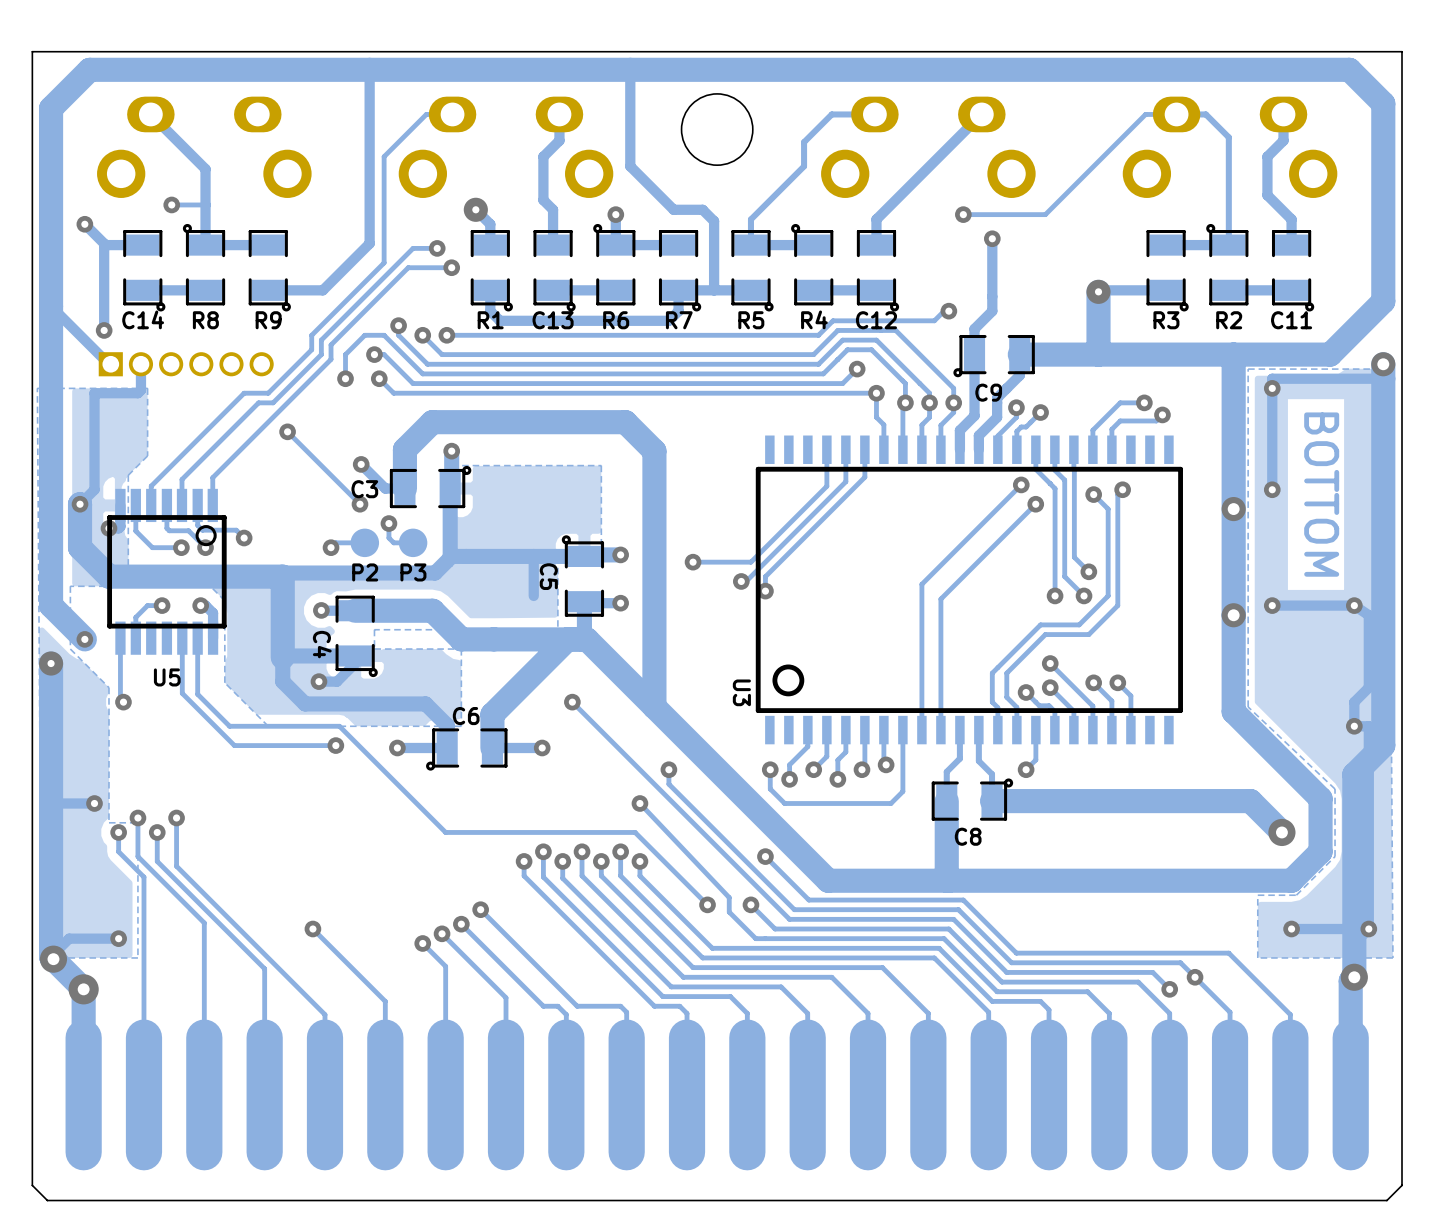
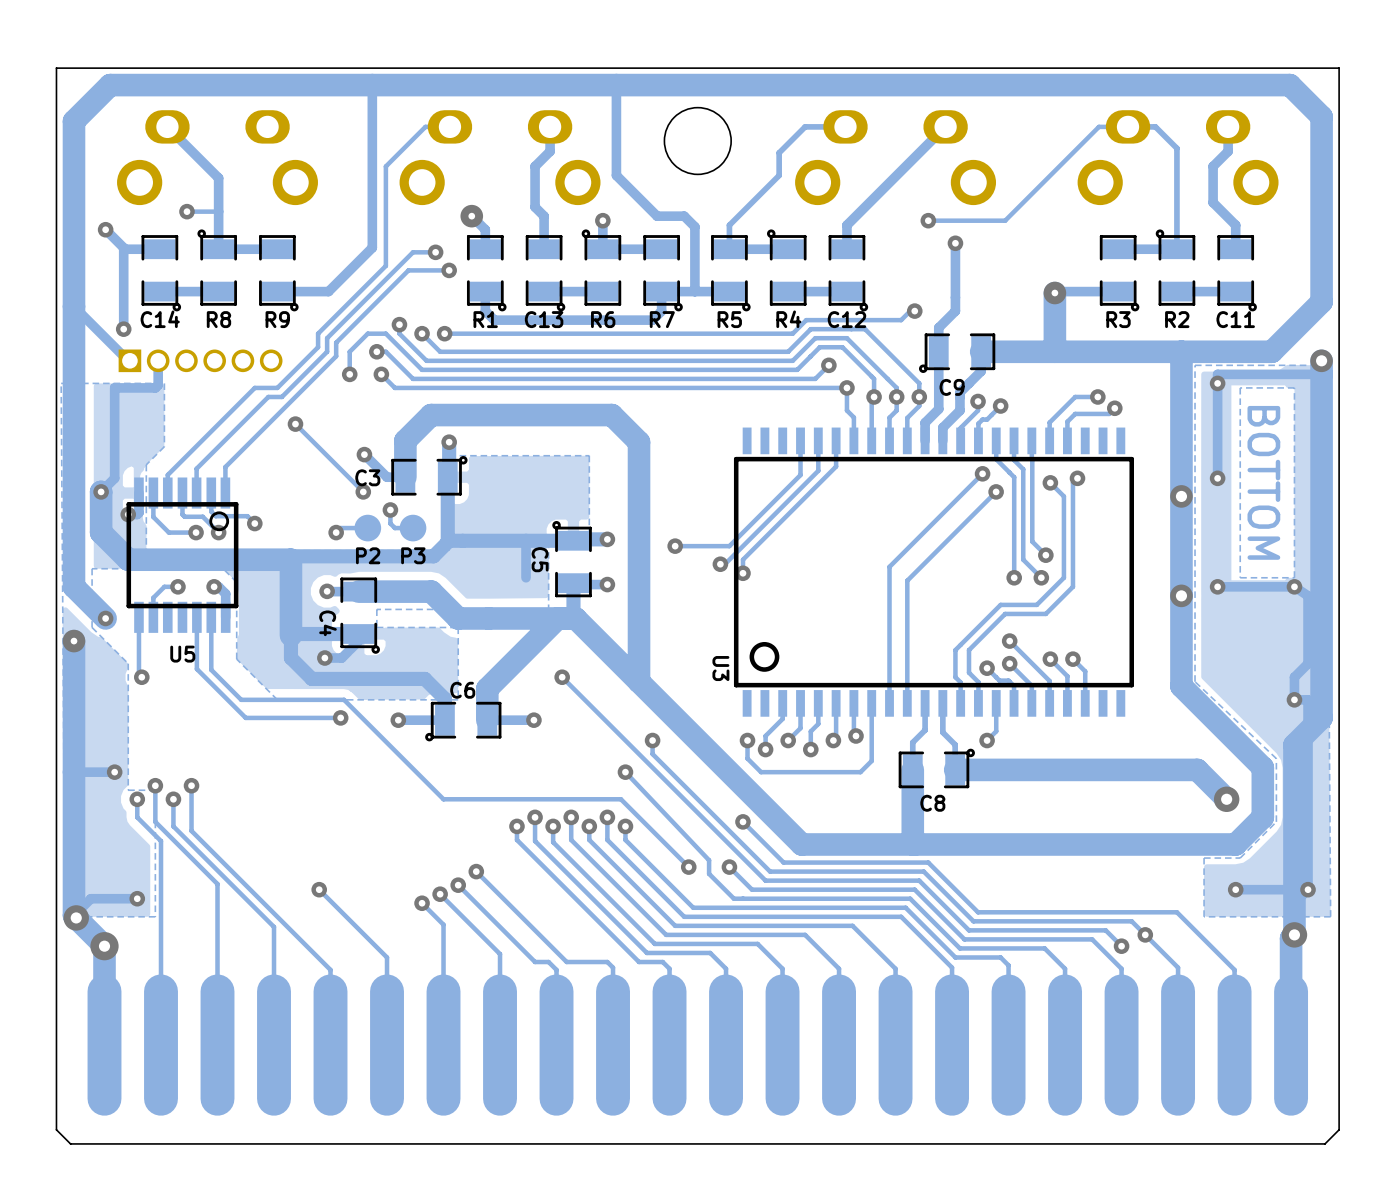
zone outline: none -> (1294, 387) (1294, 577) (1240, 577) (1240, 387) (1294, 387)

